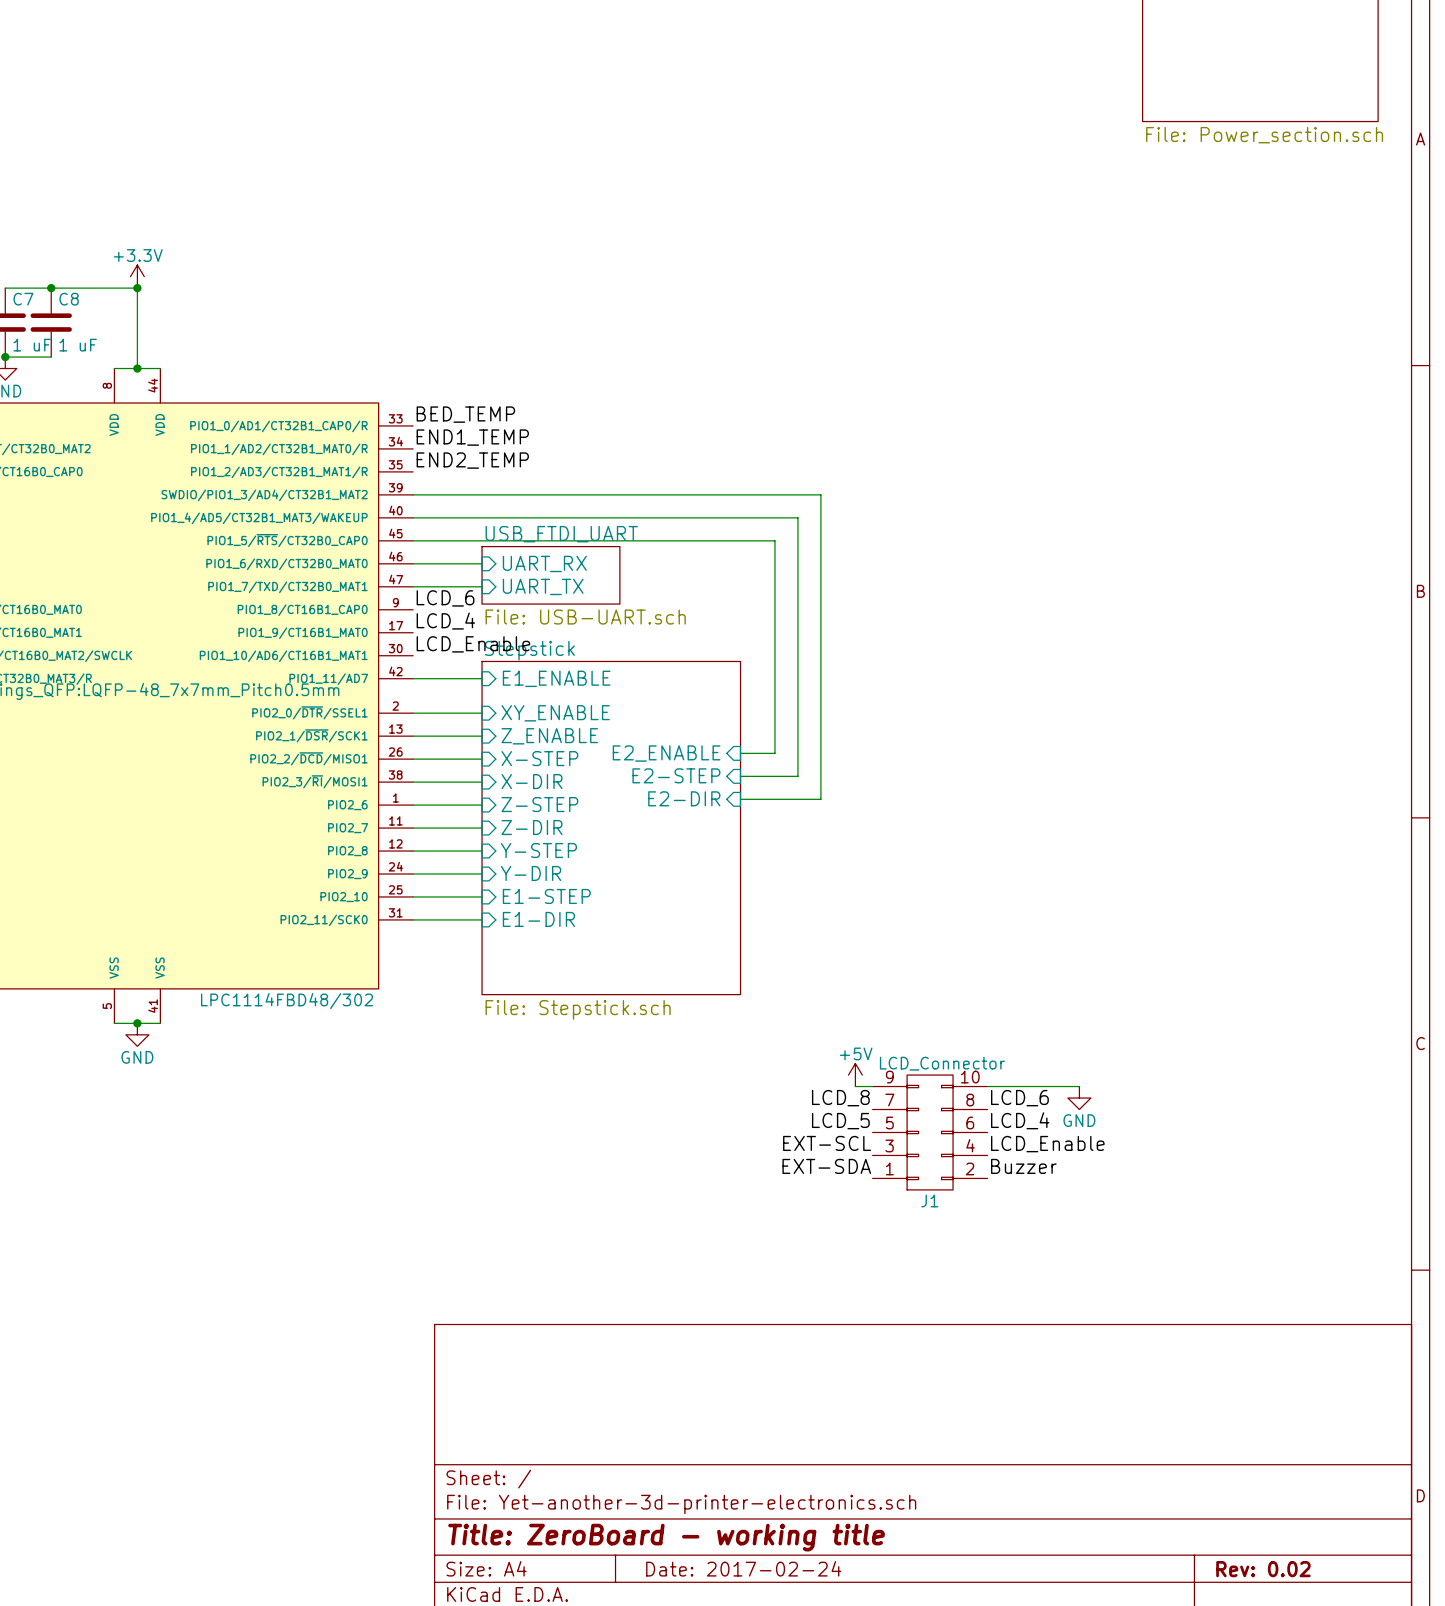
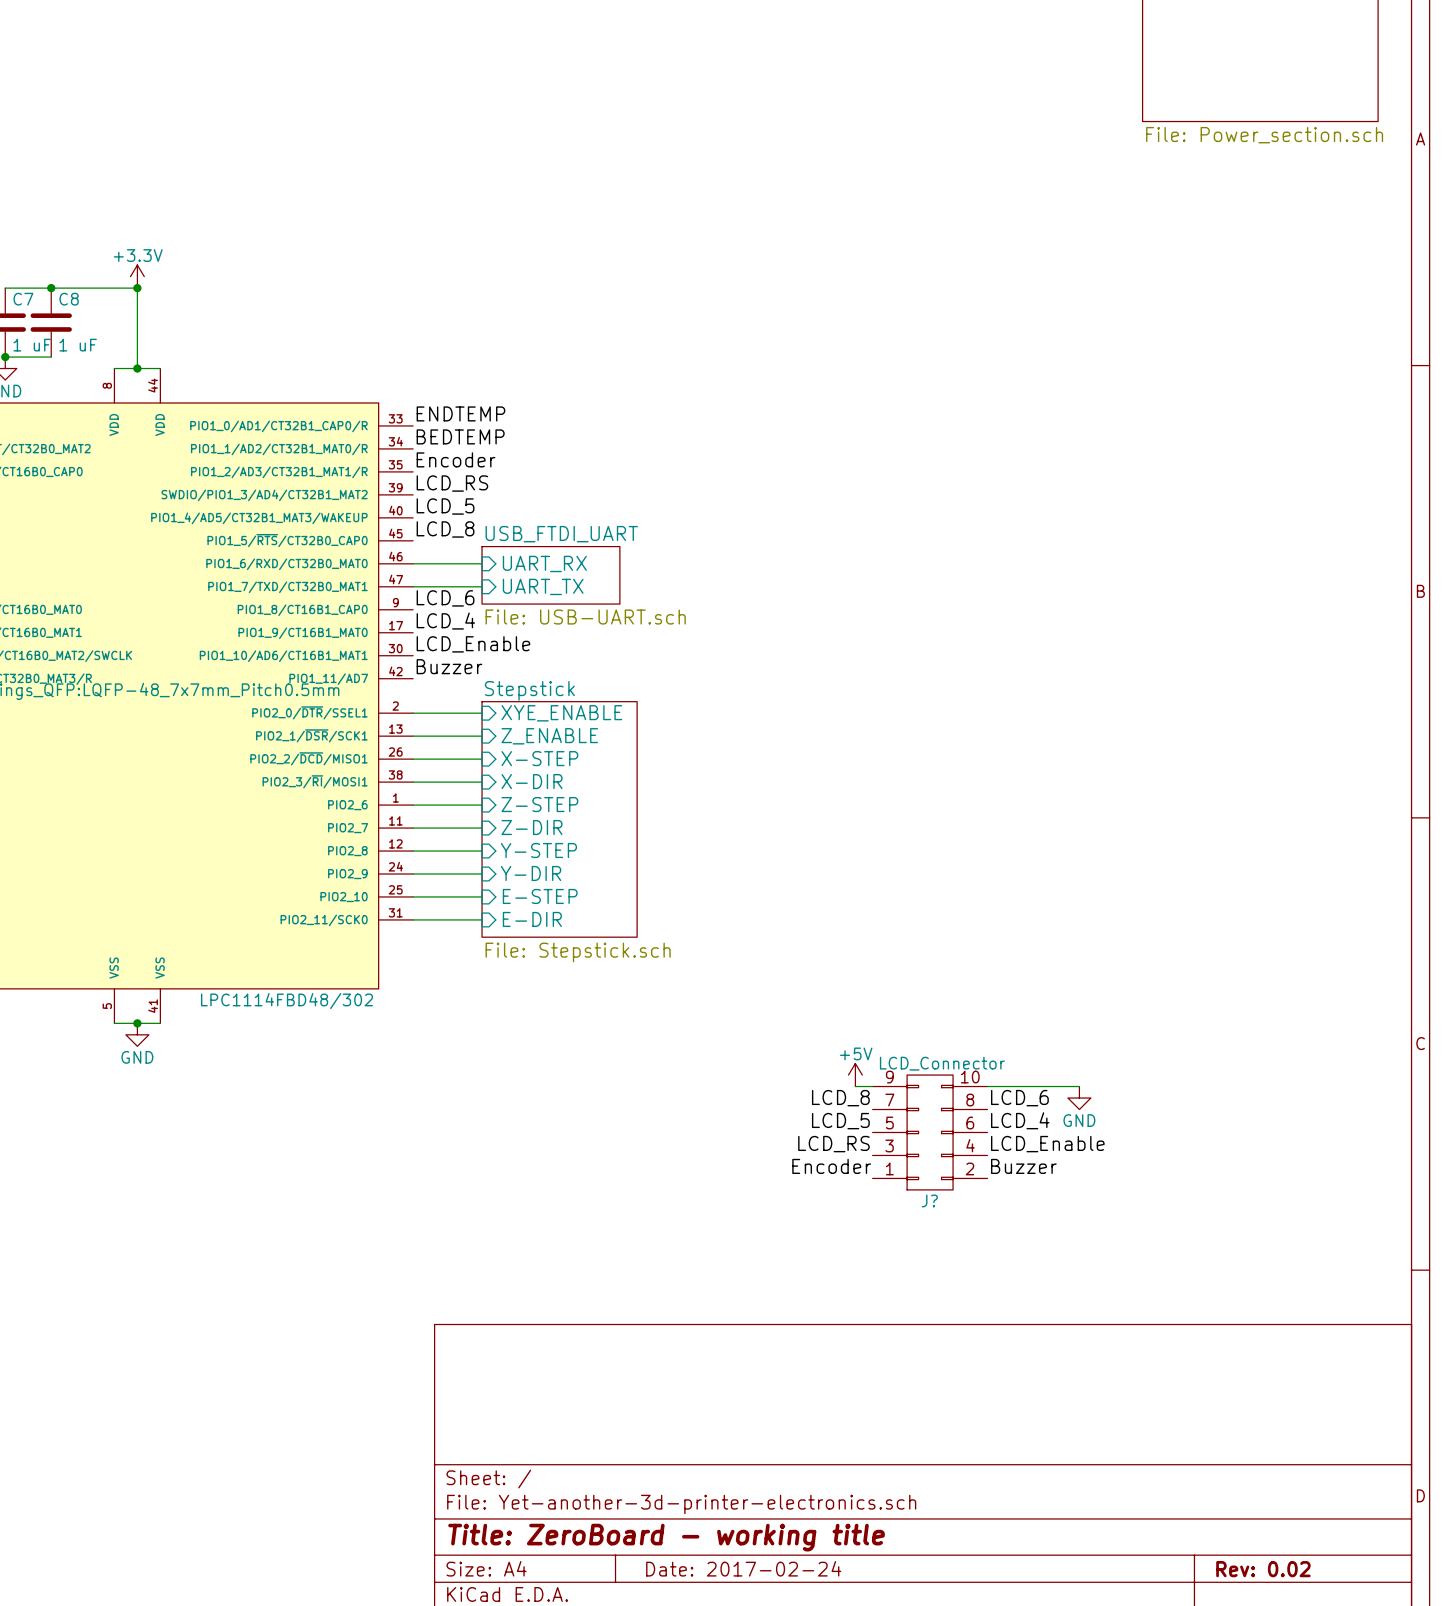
label: BED_TEMP (465, 414) -> ENDTEMP (460, 413)
label: END1_TEMP (472, 437) -> BEDTEMP (460, 436)
label: END2_TEMP (472, 460) -> Encoder (456, 459)
label: none -> LCD_RS (452, 483)
wire: (413, 494) (820, 494) (820, 799) (740, 799) -> none
label: none -> LCD_5 (445, 506)
wire: (413, 517) (797, 517) (797, 776) (740, 776) -> none
label: none -> LCD_8 (445, 529)
wire: (413, 540) (774, 540) (774, 753) (740, 753) -> none
label: none -> Buzzer (449, 666)
wire: (413, 678) (482, 678) -> none
sheet pin: E1_ENABLE (556, 678) -> none
sheet pin: XY_ENABLE (555, 713) -> XYE_ENABLE (561, 713)
sheet pin: E2_ENABLE (666, 753) -> none
sheet pin: E2-STEP (676, 775) -> none
sheet pin: E2-DIR (684, 798) -> none
sheet Stepstick: none -> File: Stepstick.sch (559, 819)
sheet Stepstick: File: Stepstick.sch (611, 828) -> none
sheet pin: E1-STEP (546, 896) -> E-STEP (540, 896)
sheet pin: E1-DIR (538, 919) -> E-DIR (532, 919)
label: EXT-SCL (827, 1143) -> LCD_RS (833, 1144)
label: EXT-SDA (826, 1166) -> Encoder (831, 1166)
J1 name: J1 (929, 1200) -> J? (929, 1200)

